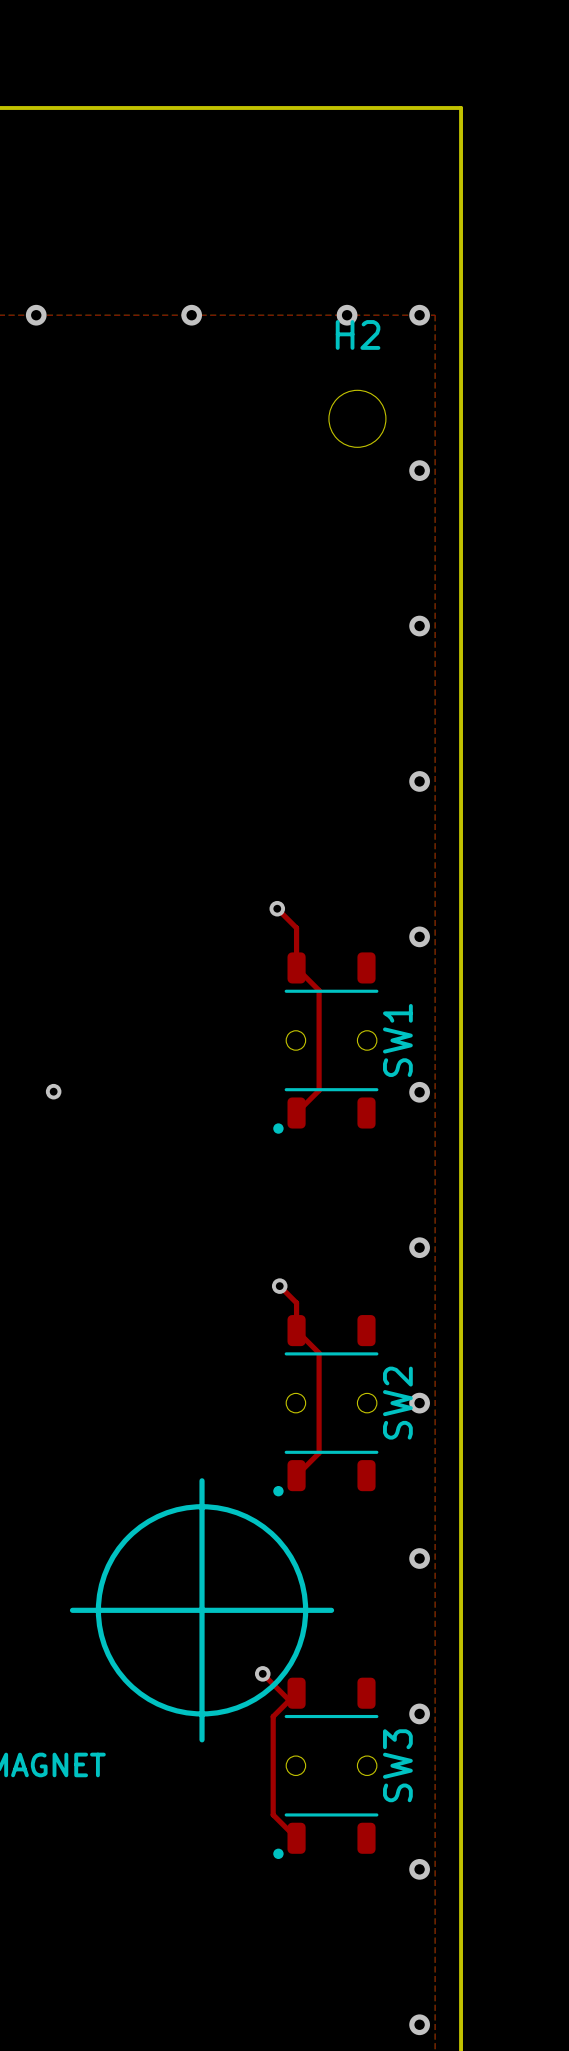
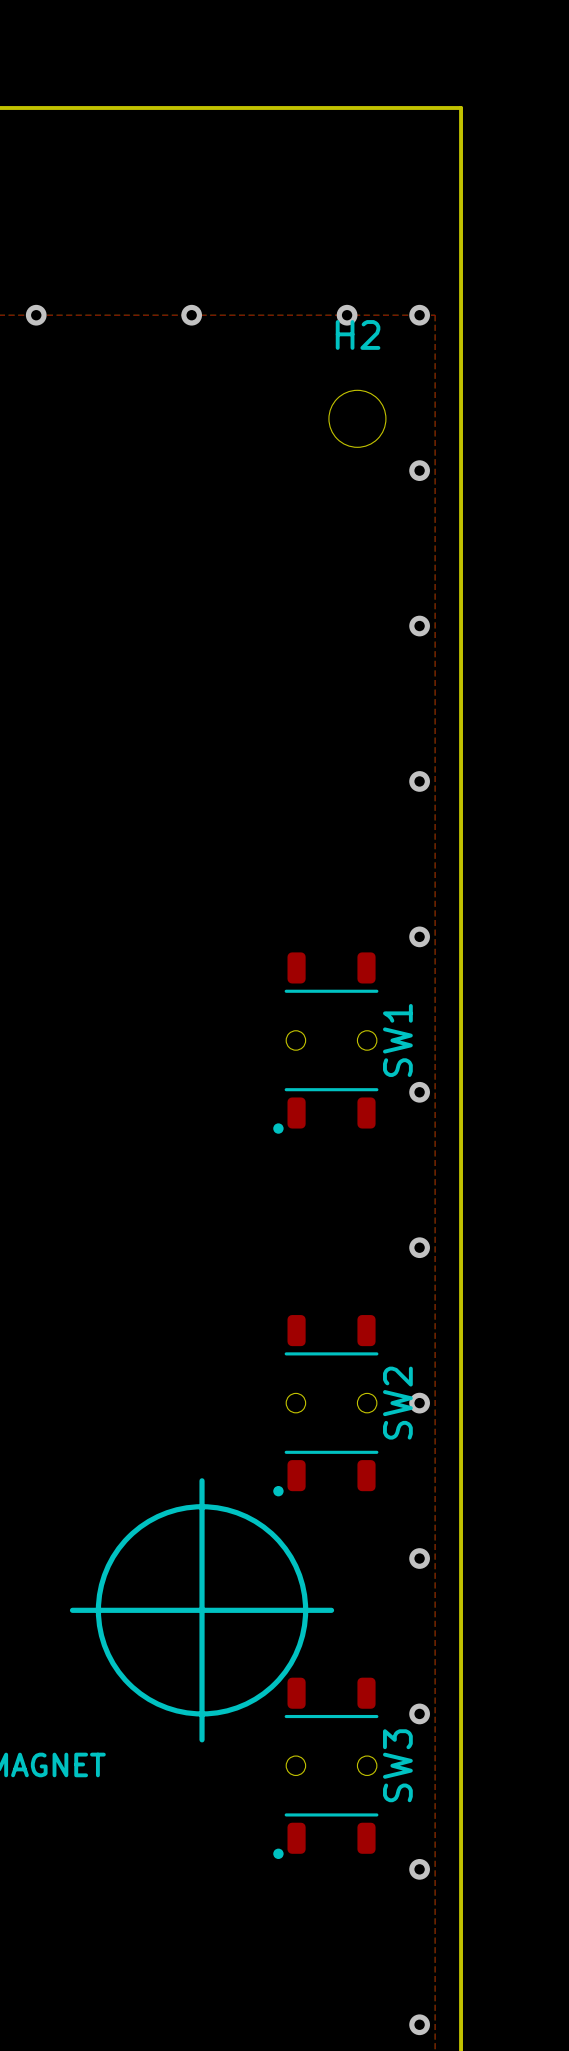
top track: (277, 908) (296, 928) (296, 967) (319, 990) (319, 1090) (296, 1113) -> none
via: (277, 908) -> none
via: (53, 1091) -> none
top track: (279, 1286) (296, 1302) (296, 1330) (319, 1353) (319, 1453) (296, 1475) -> none
via: (279, 1286) -> none
top track: (262, 1673) (289, 1700) -> none
via: (262, 1673) -> none
top track: (296, 1693) (273, 1716) (273, 1814) (296, 1838) -> none

